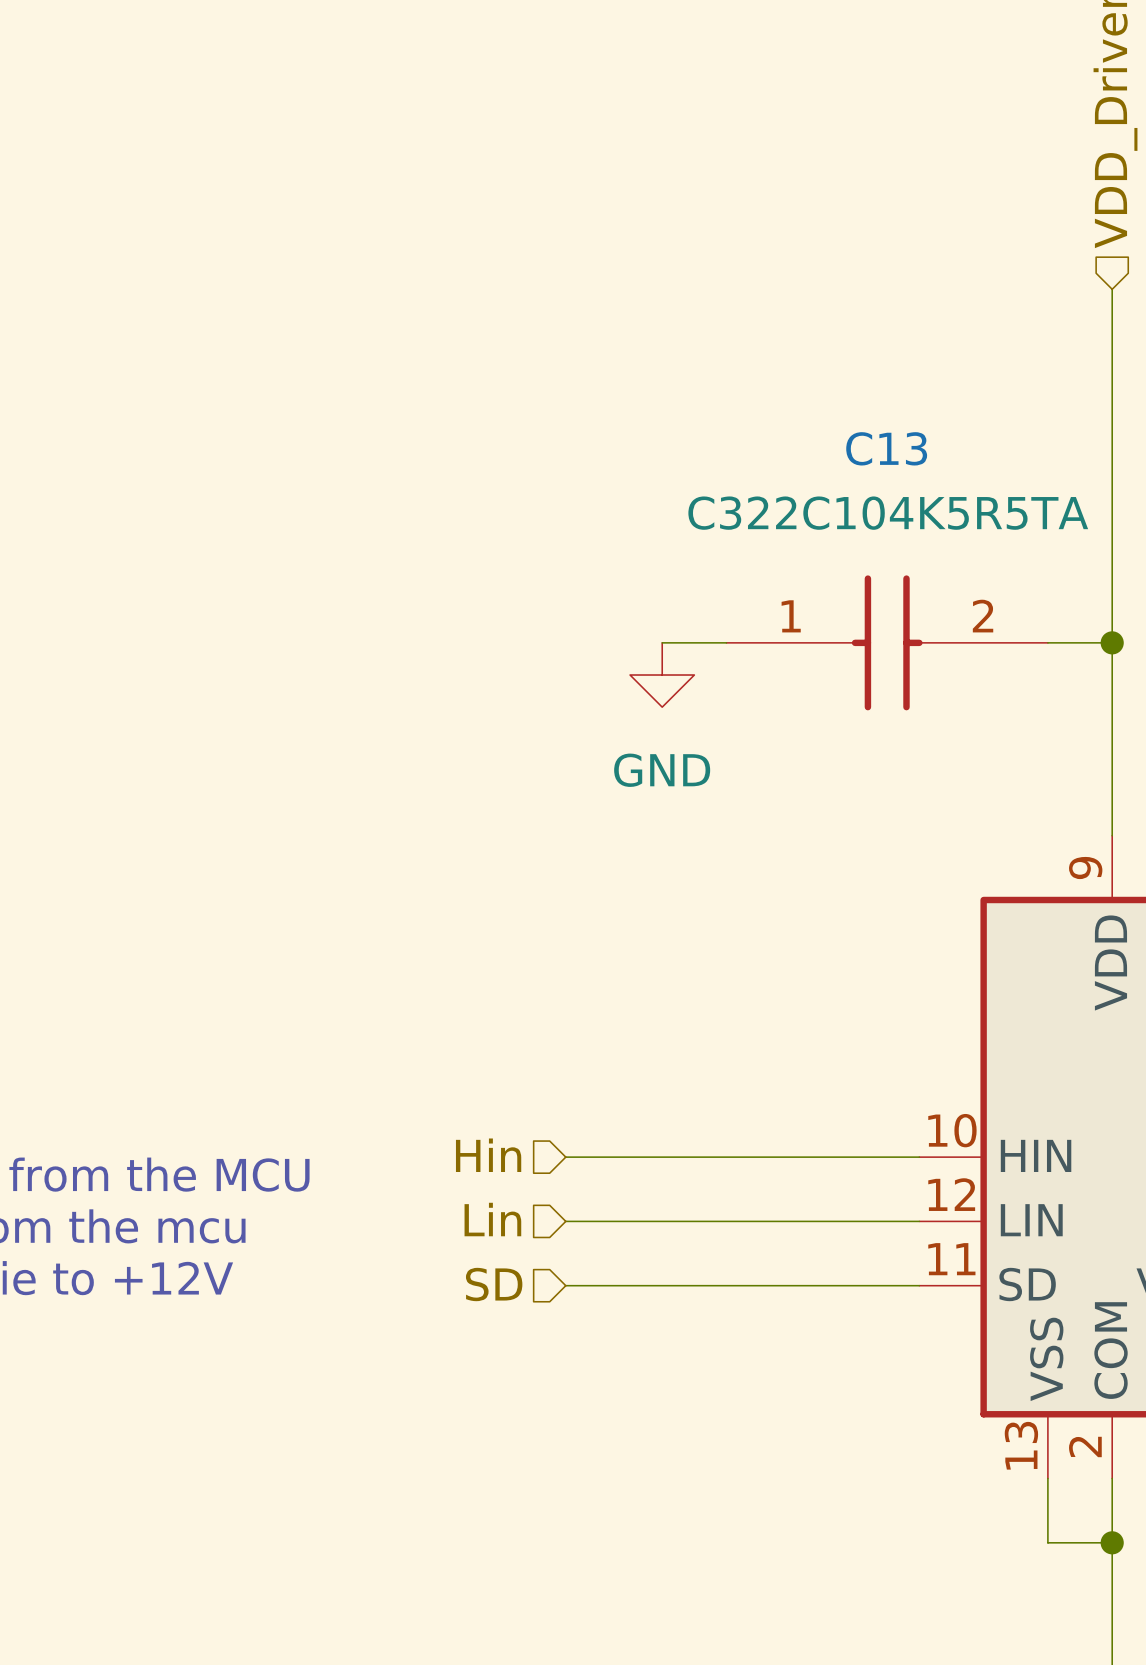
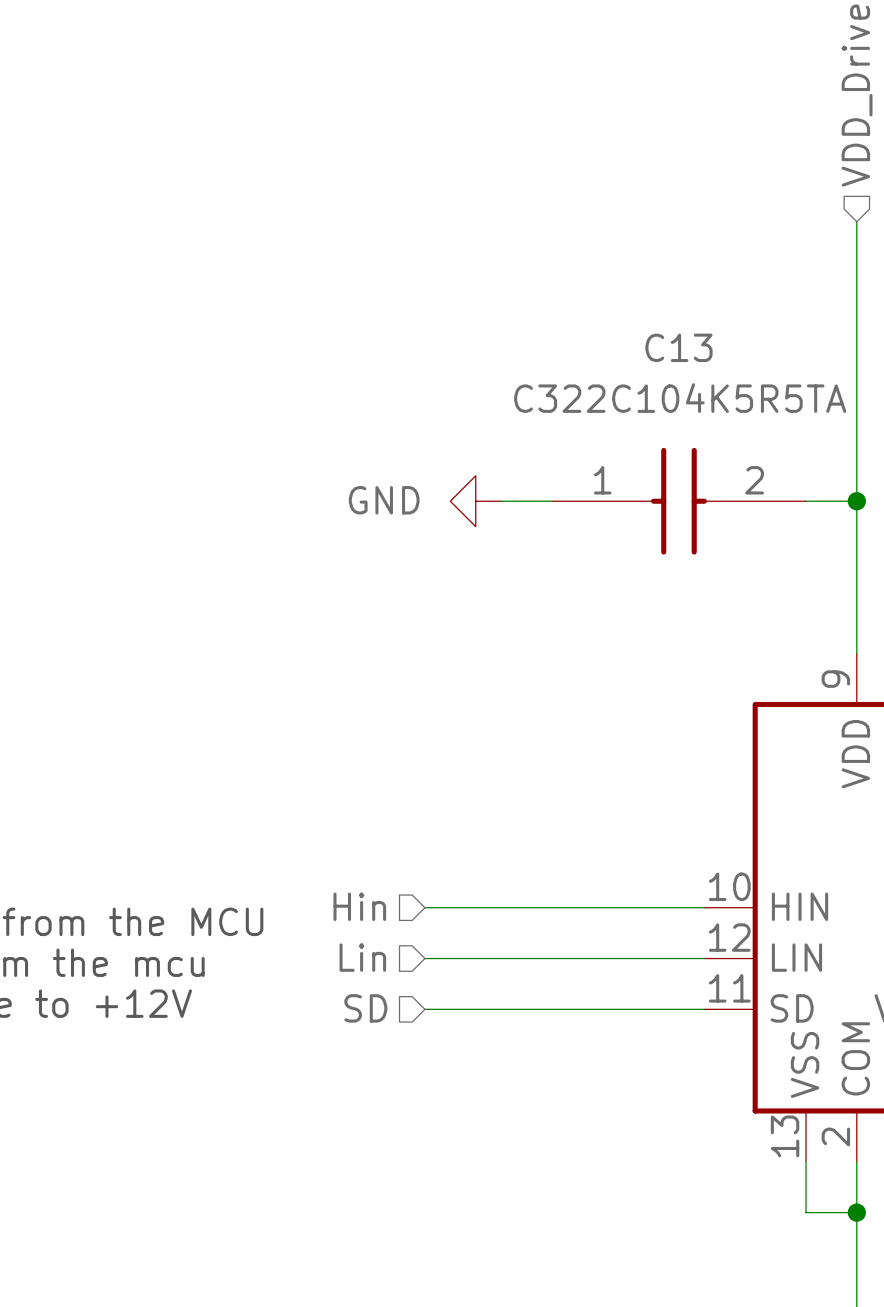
power symbol rotation: 0° (662, 675) -> 90° clockwise (475, 501)
power symbol position: GND (662, 675) -> GND (475, 501)

